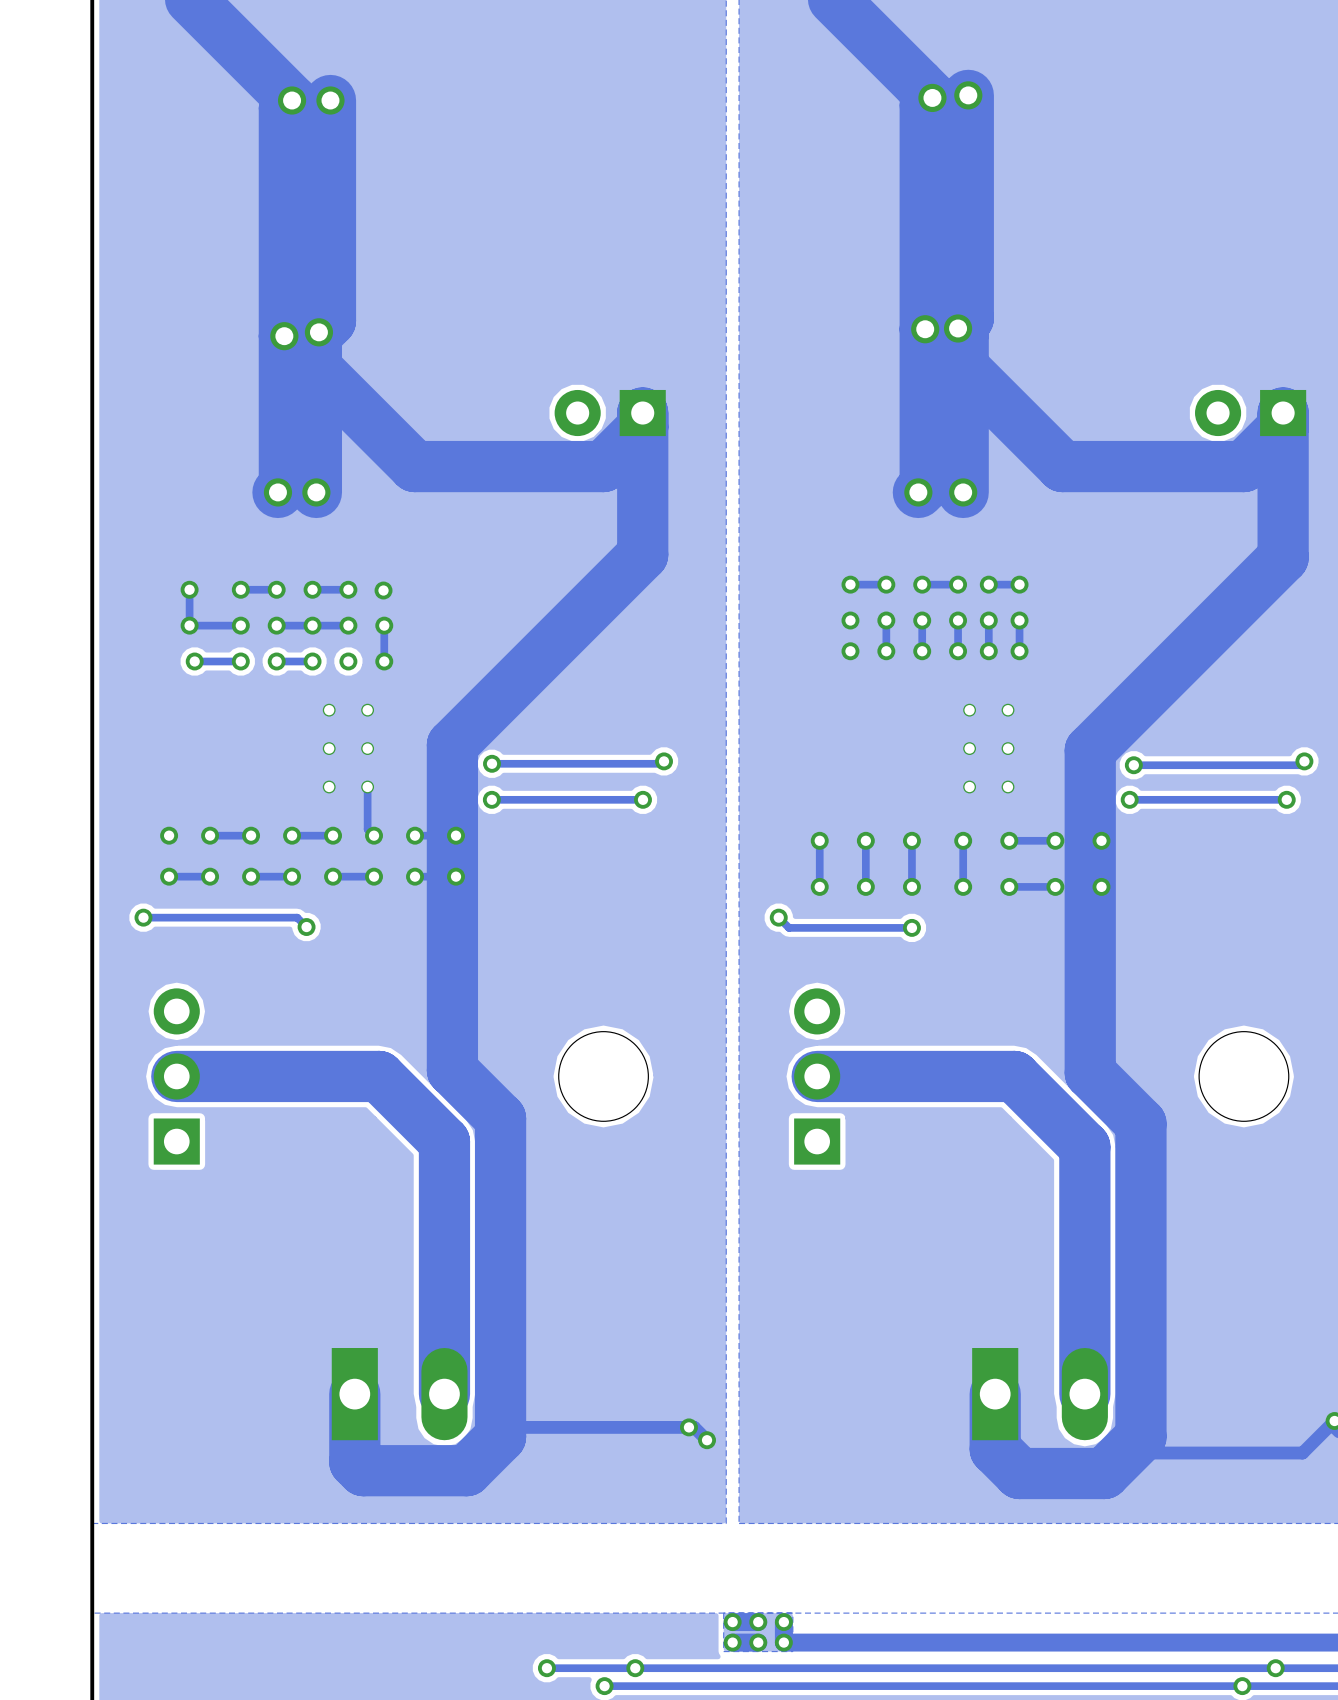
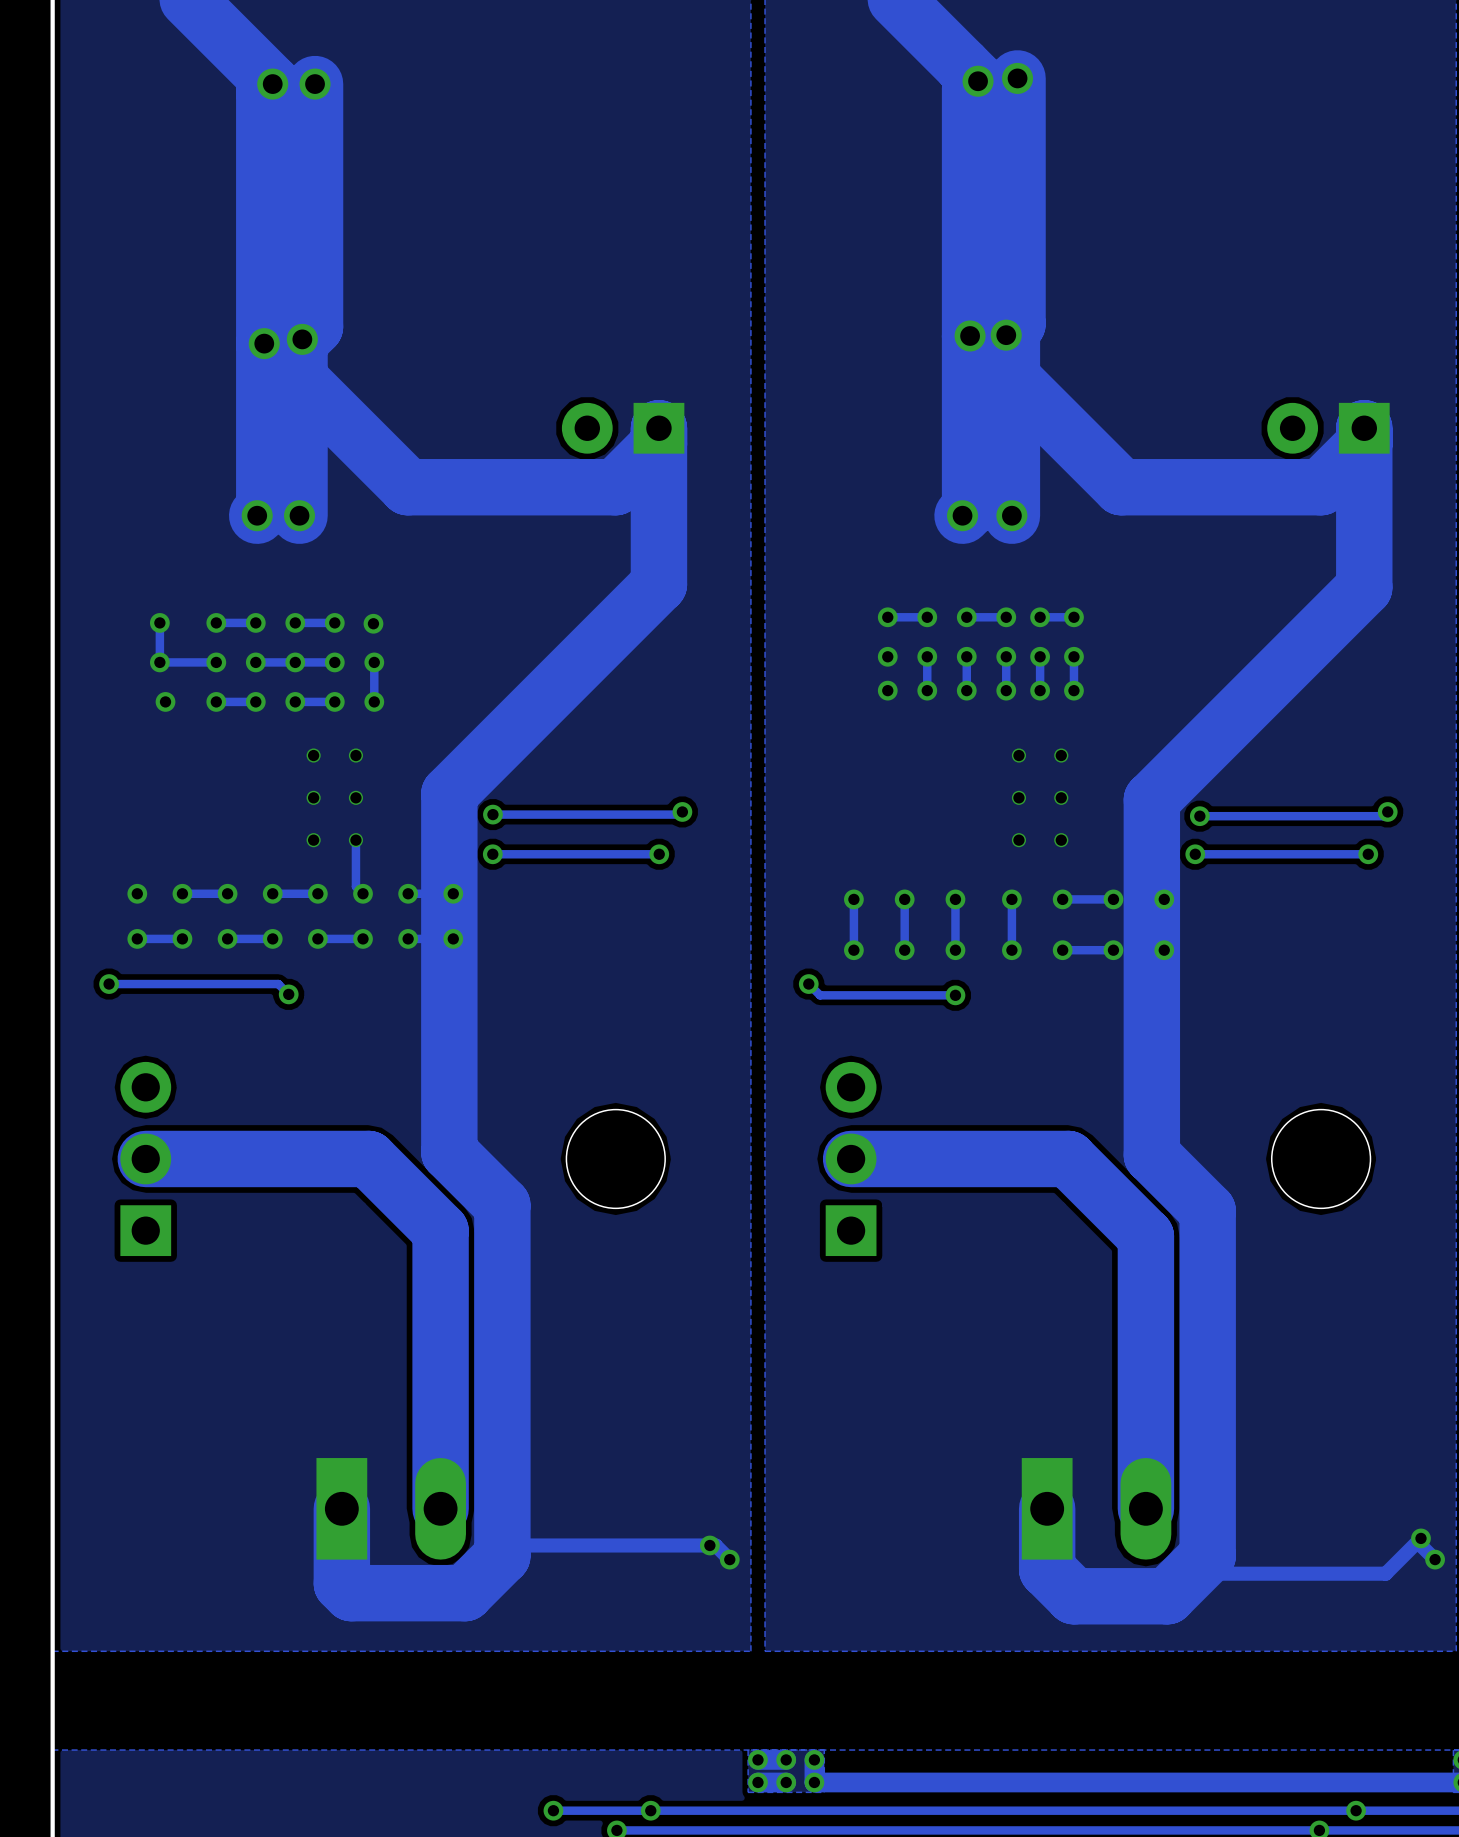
track: (240, 661) (194, 661) -> none
track: (312, 661) (276, 661) -> (216, 701) (255, 701)
track: none -> (334, 701) (295, 701)

